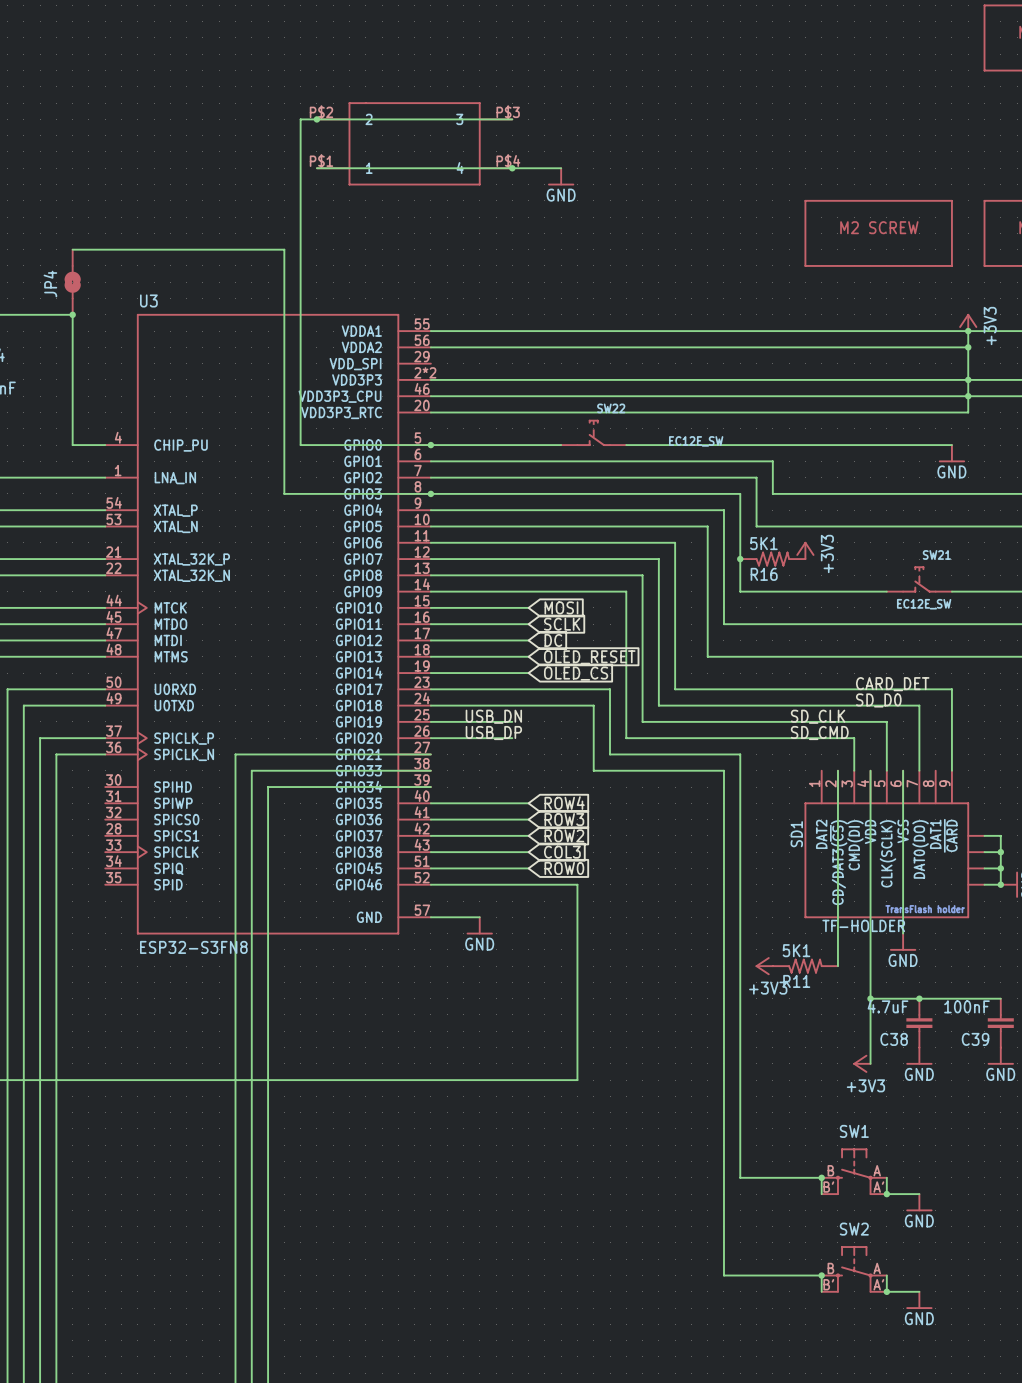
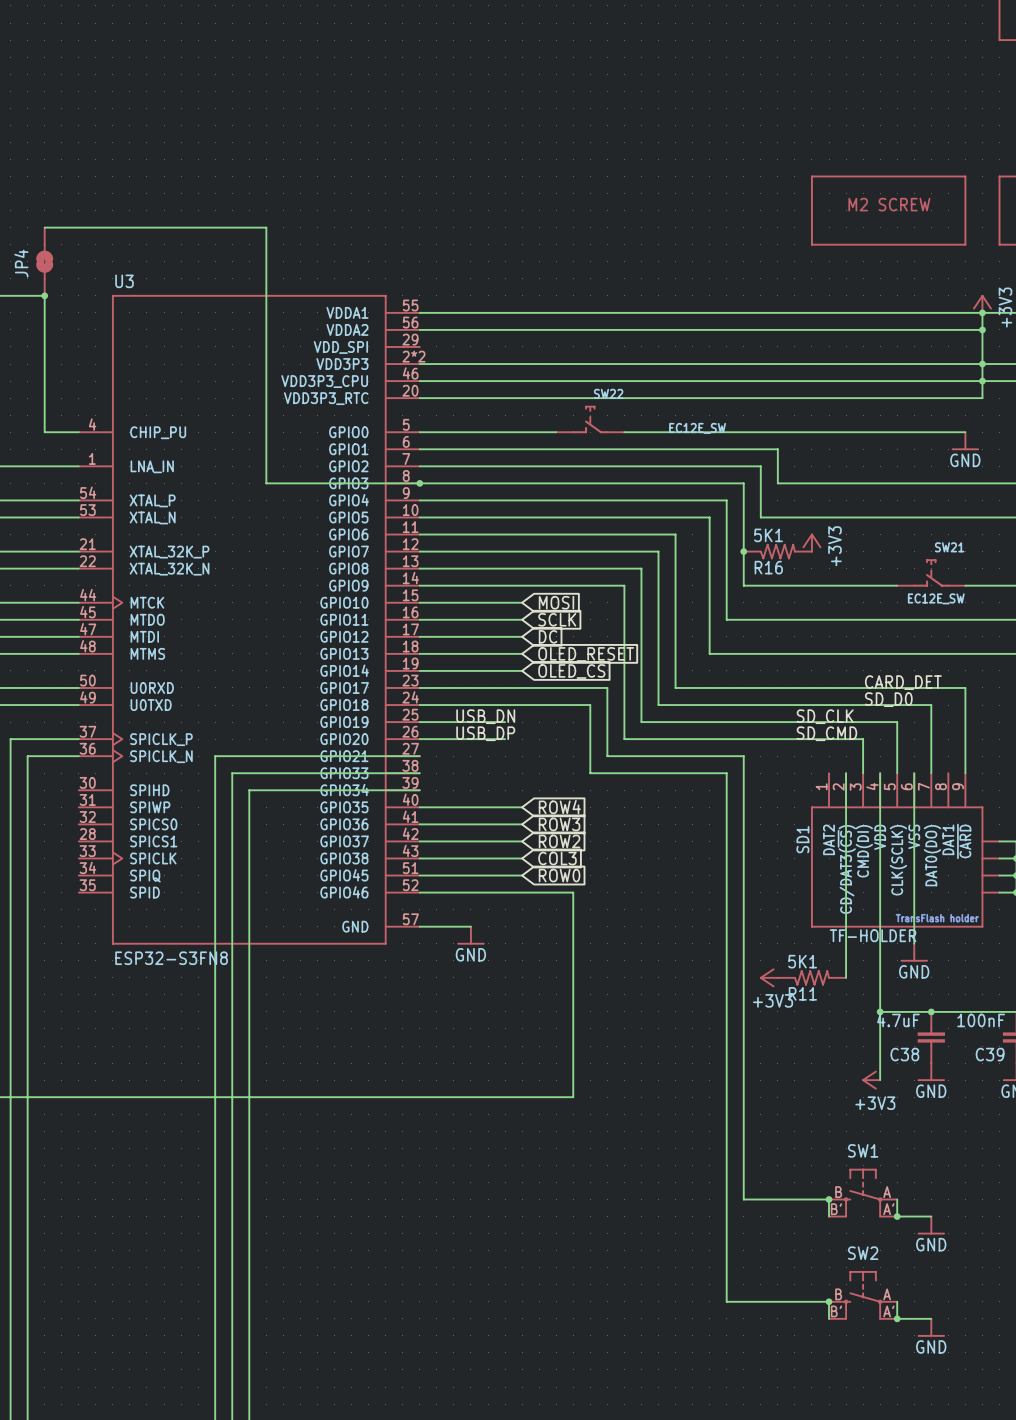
junction: (316, 119) -> none
wire: (512, 119) (300, 119) (300, 445) (430, 445) -> none
part: (414, 143) -> none
wire: (316, 168) (561, 168) -> none
junction: (512, 168) -> none
power symbol: GND (561, 176) -> none
junction: (430, 445) -> none

